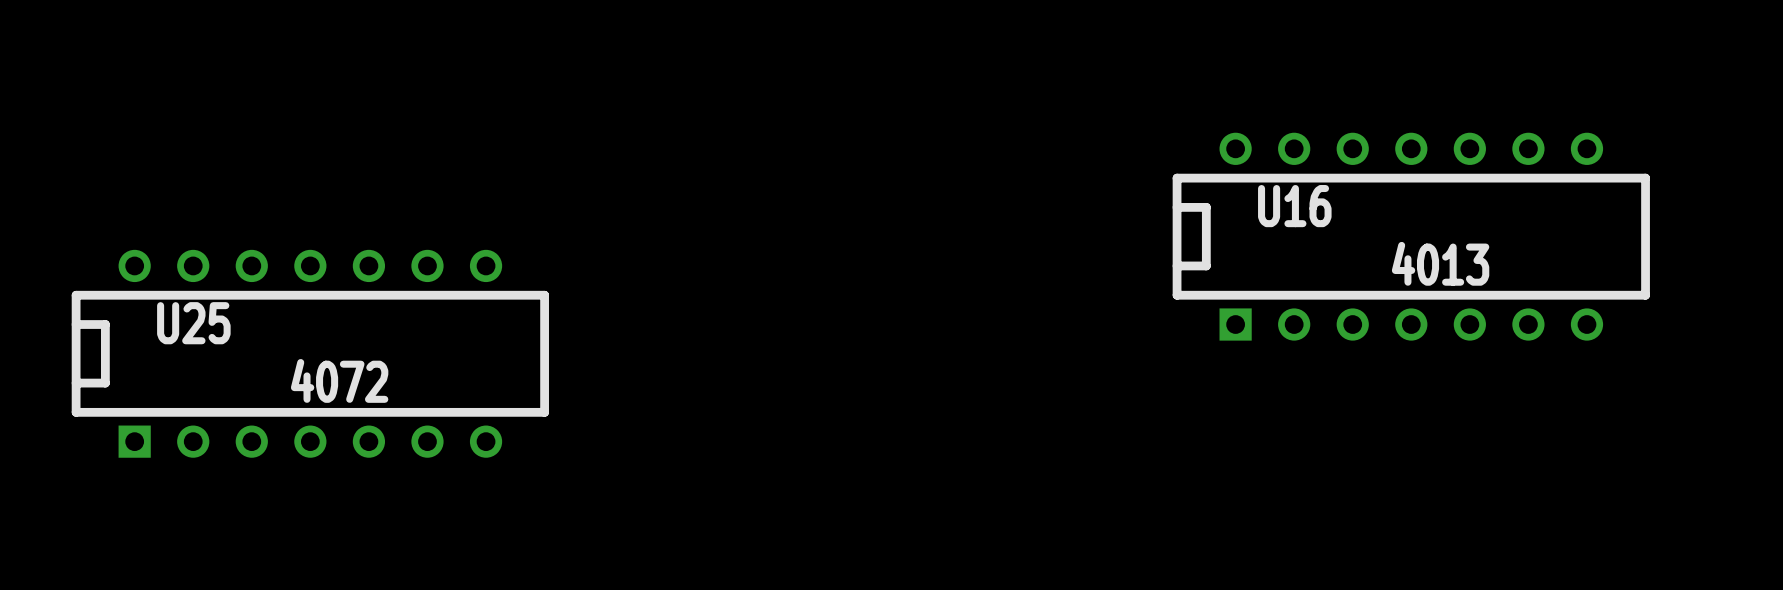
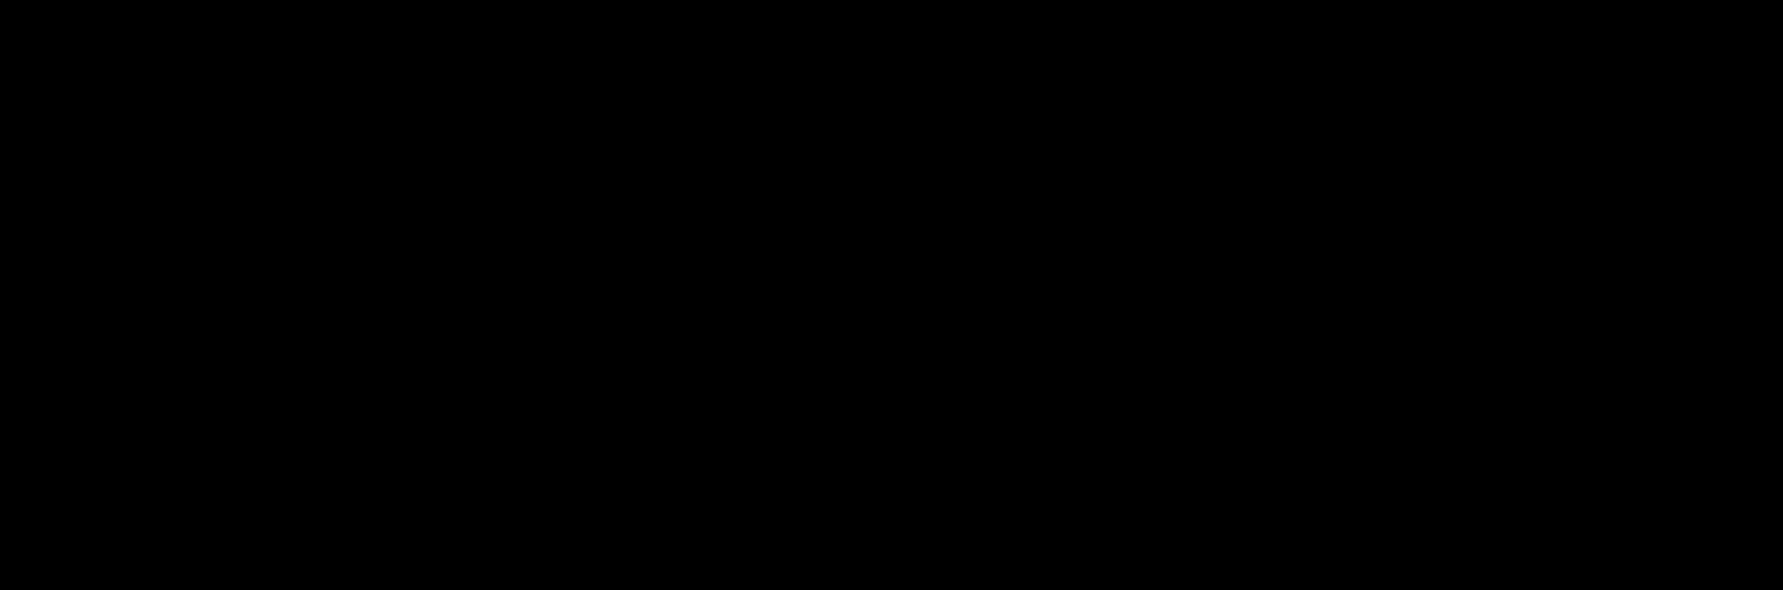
U16: 4013 (1411, 236) -> none
U25: 4072 (310, 353) -> none

